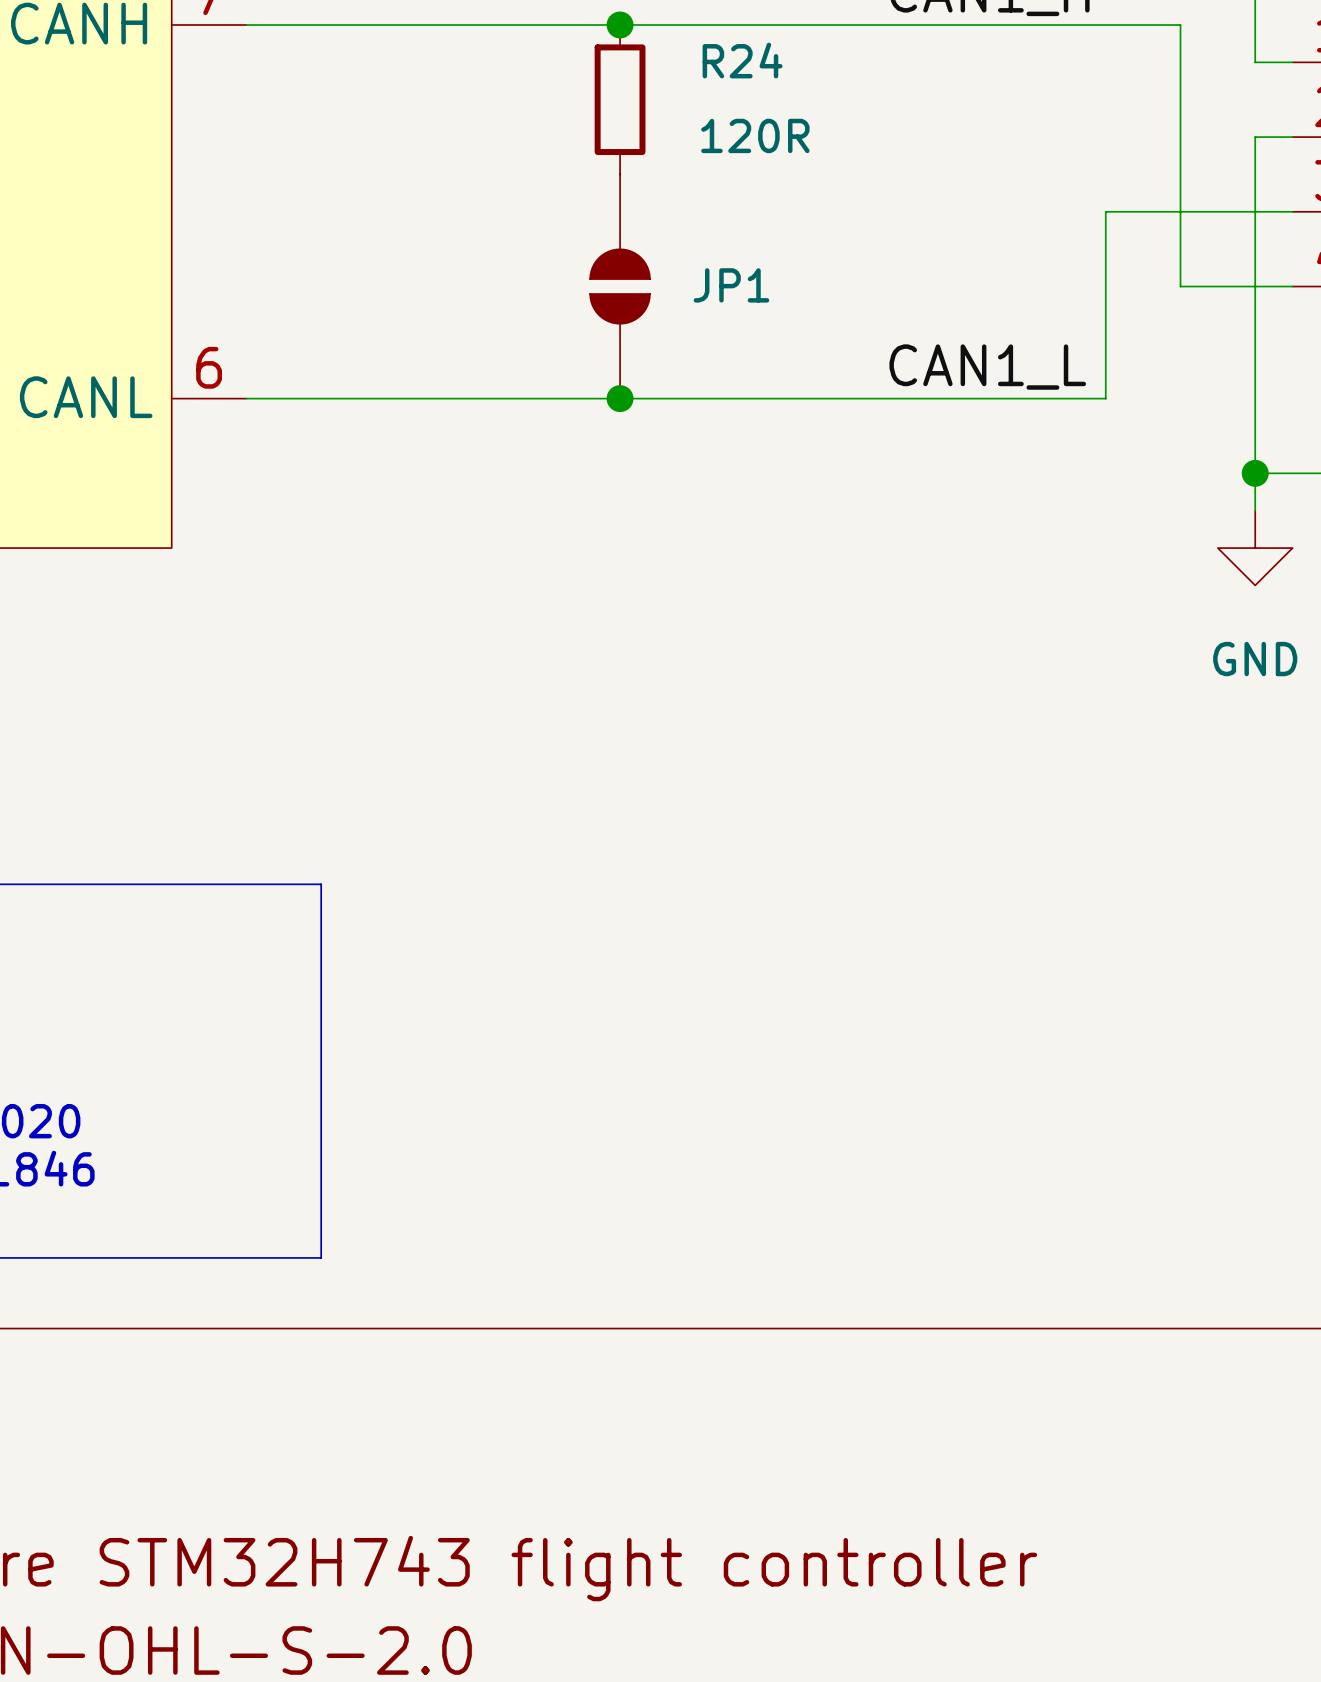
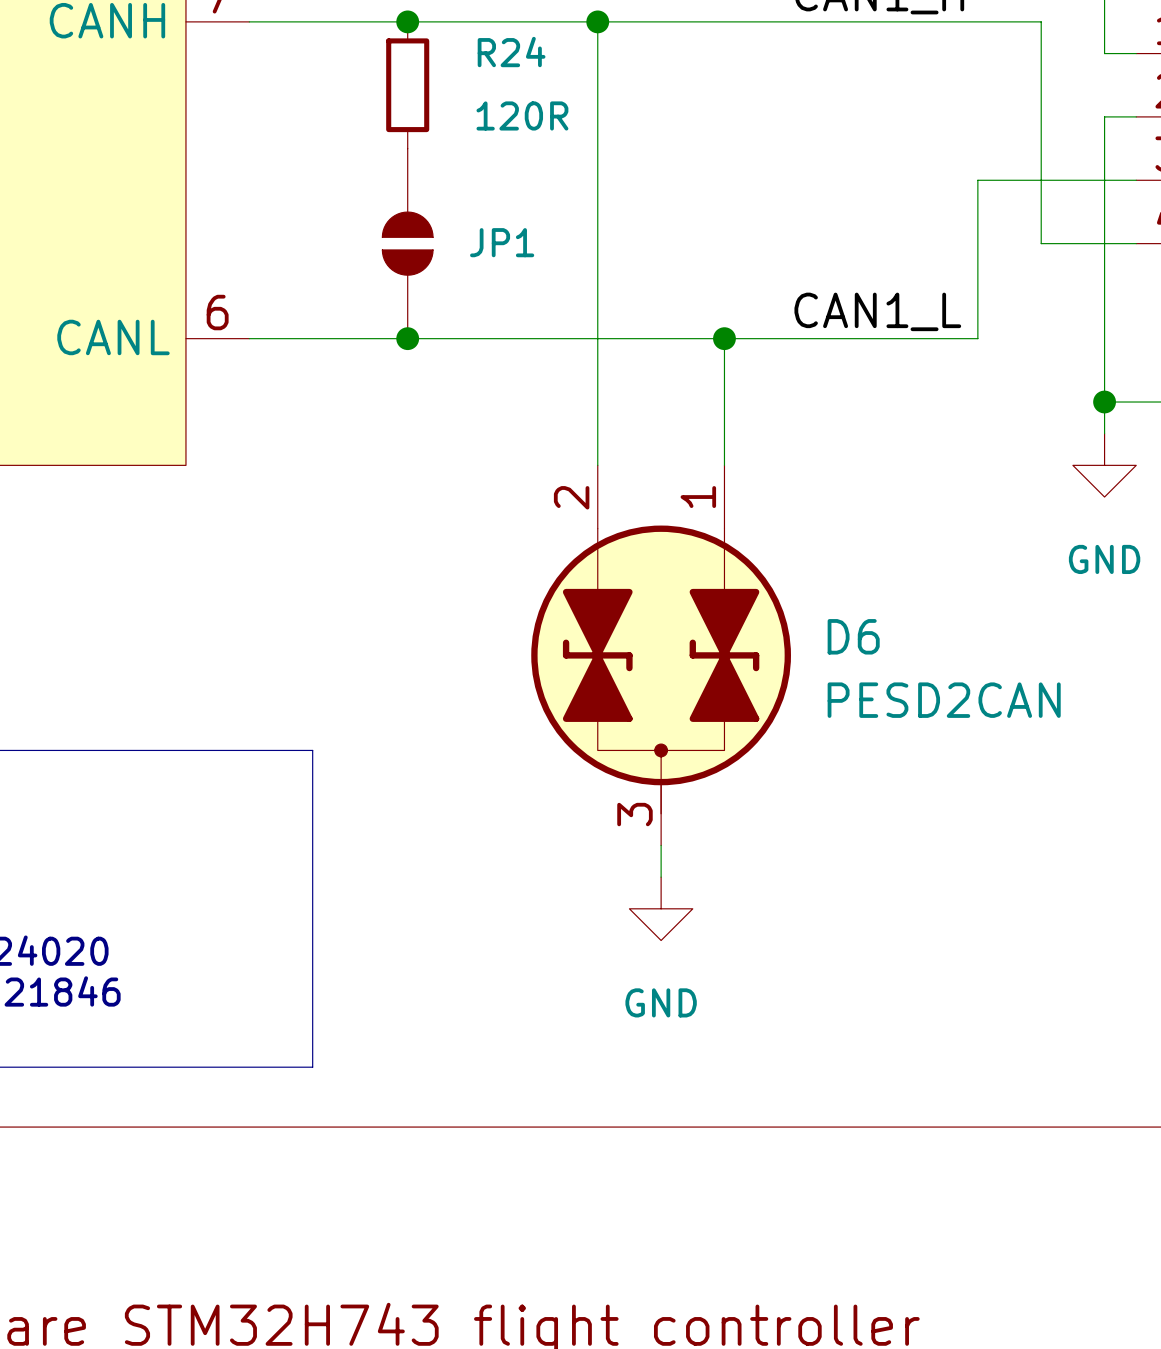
junction: none -> (407, 21)
junction position: (620, 24) -> (597, 21)
wire: none -> (597, 21) (597, 465)
R24 position: (620, 99) -> (407, 85)
JP1 position: (620, 286) -> (407, 243)
junction: none -> (407, 338)
junction: (620, 398) -> none
wire: none -> (724, 338) (724, 465)
junction: none -> (724, 338)
D6: none -> PESD2CAN (661, 655)
wire: none -> (661, 845) (661, 877)
power symbol: none -> GND (661, 908)

